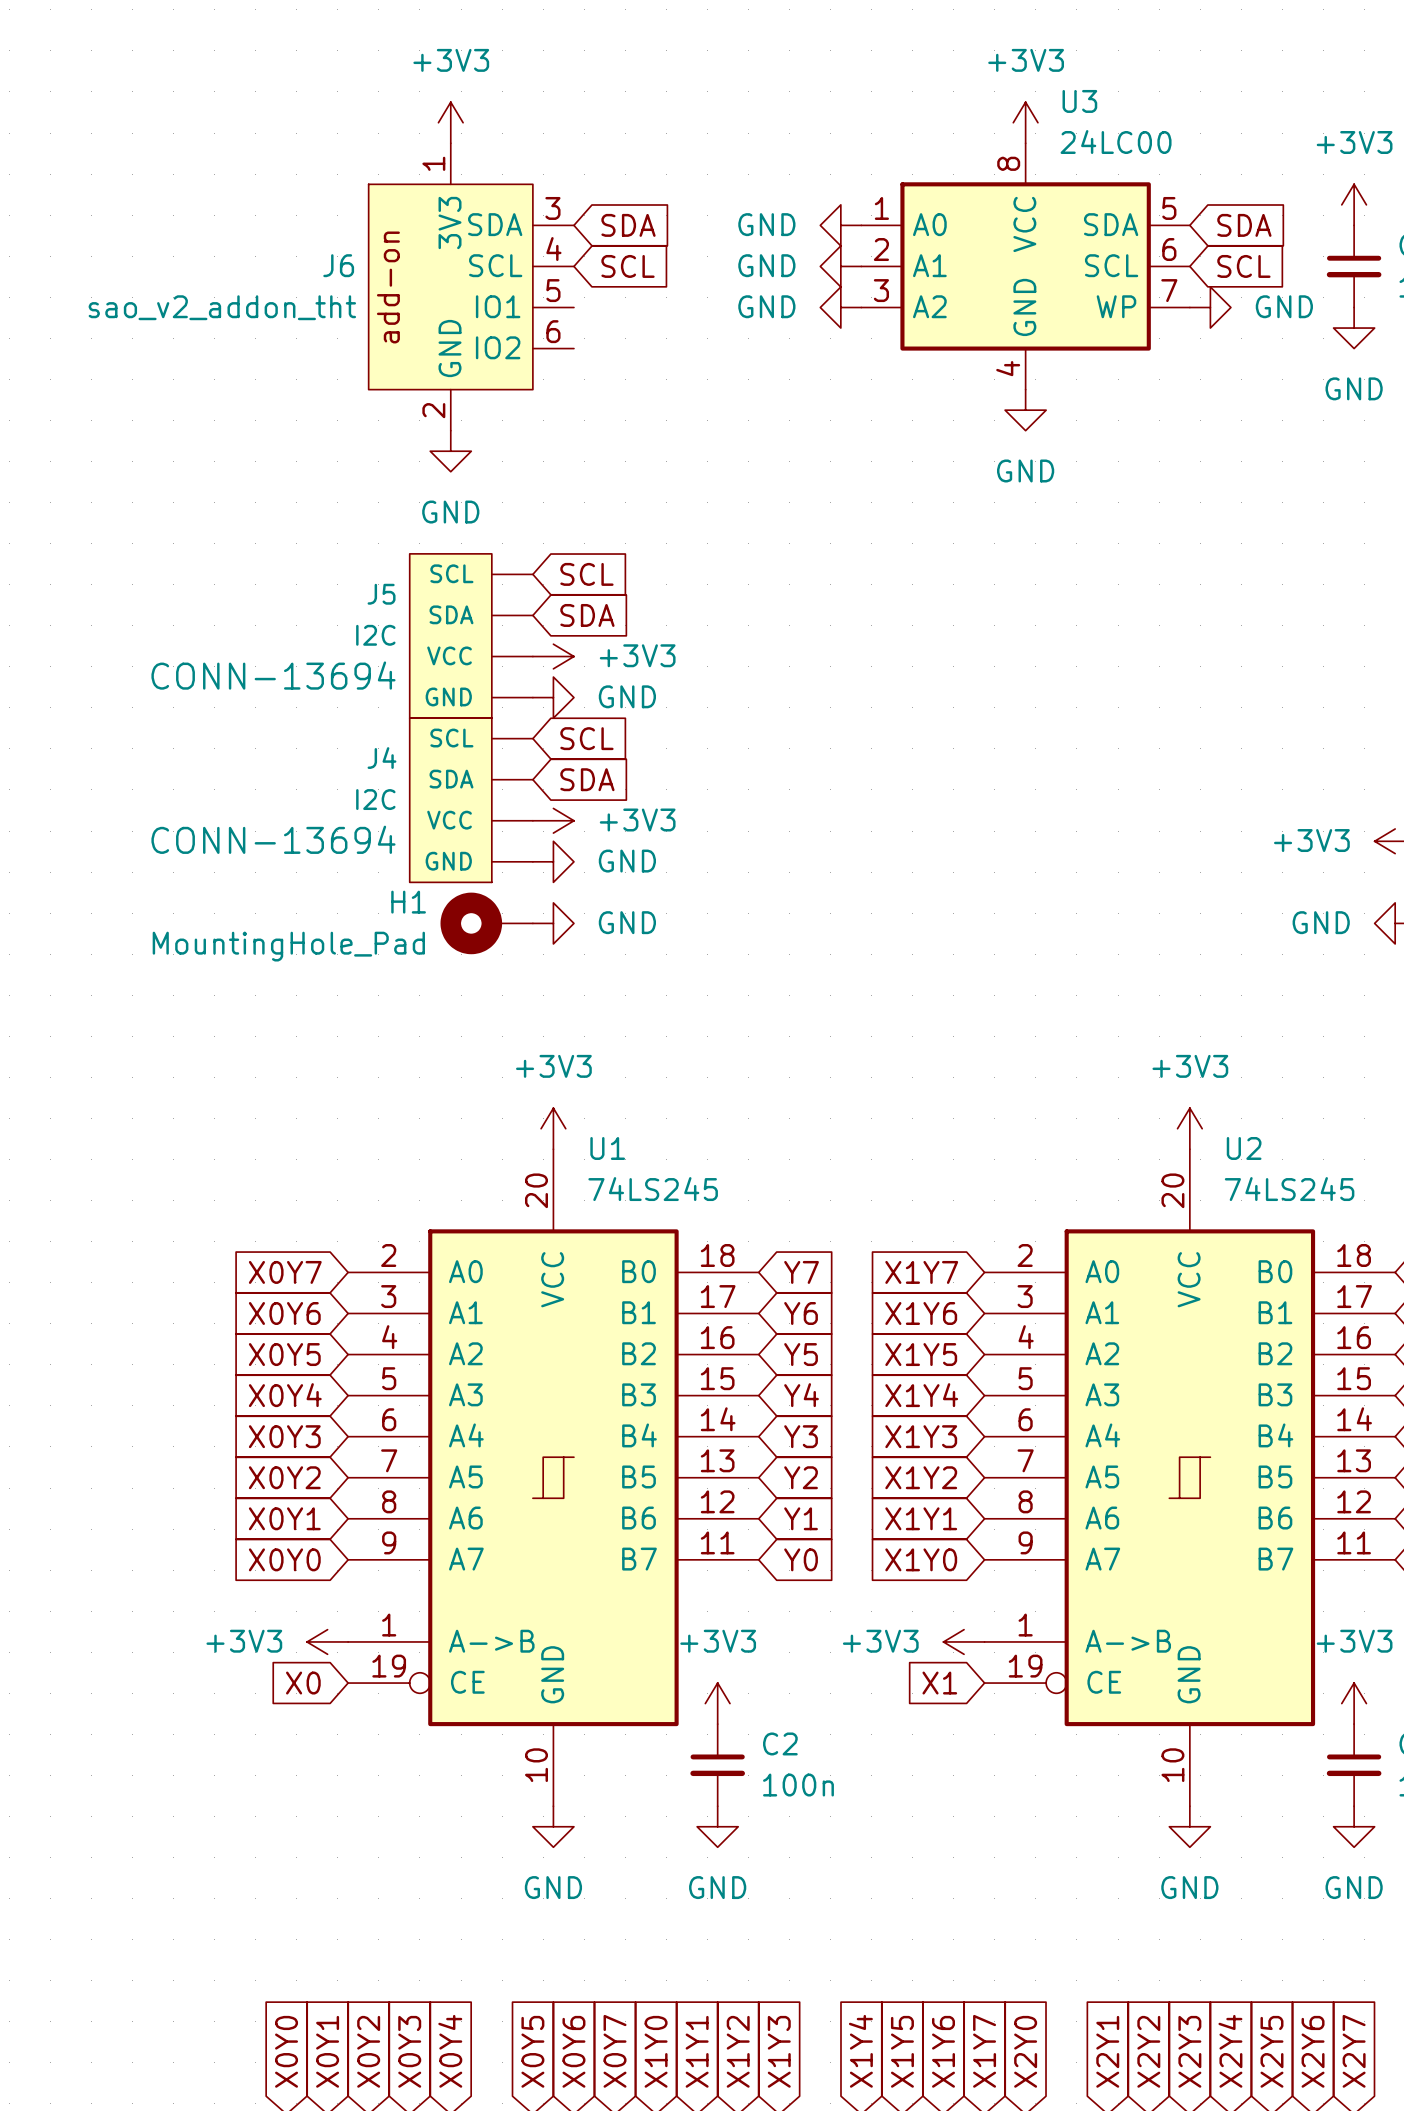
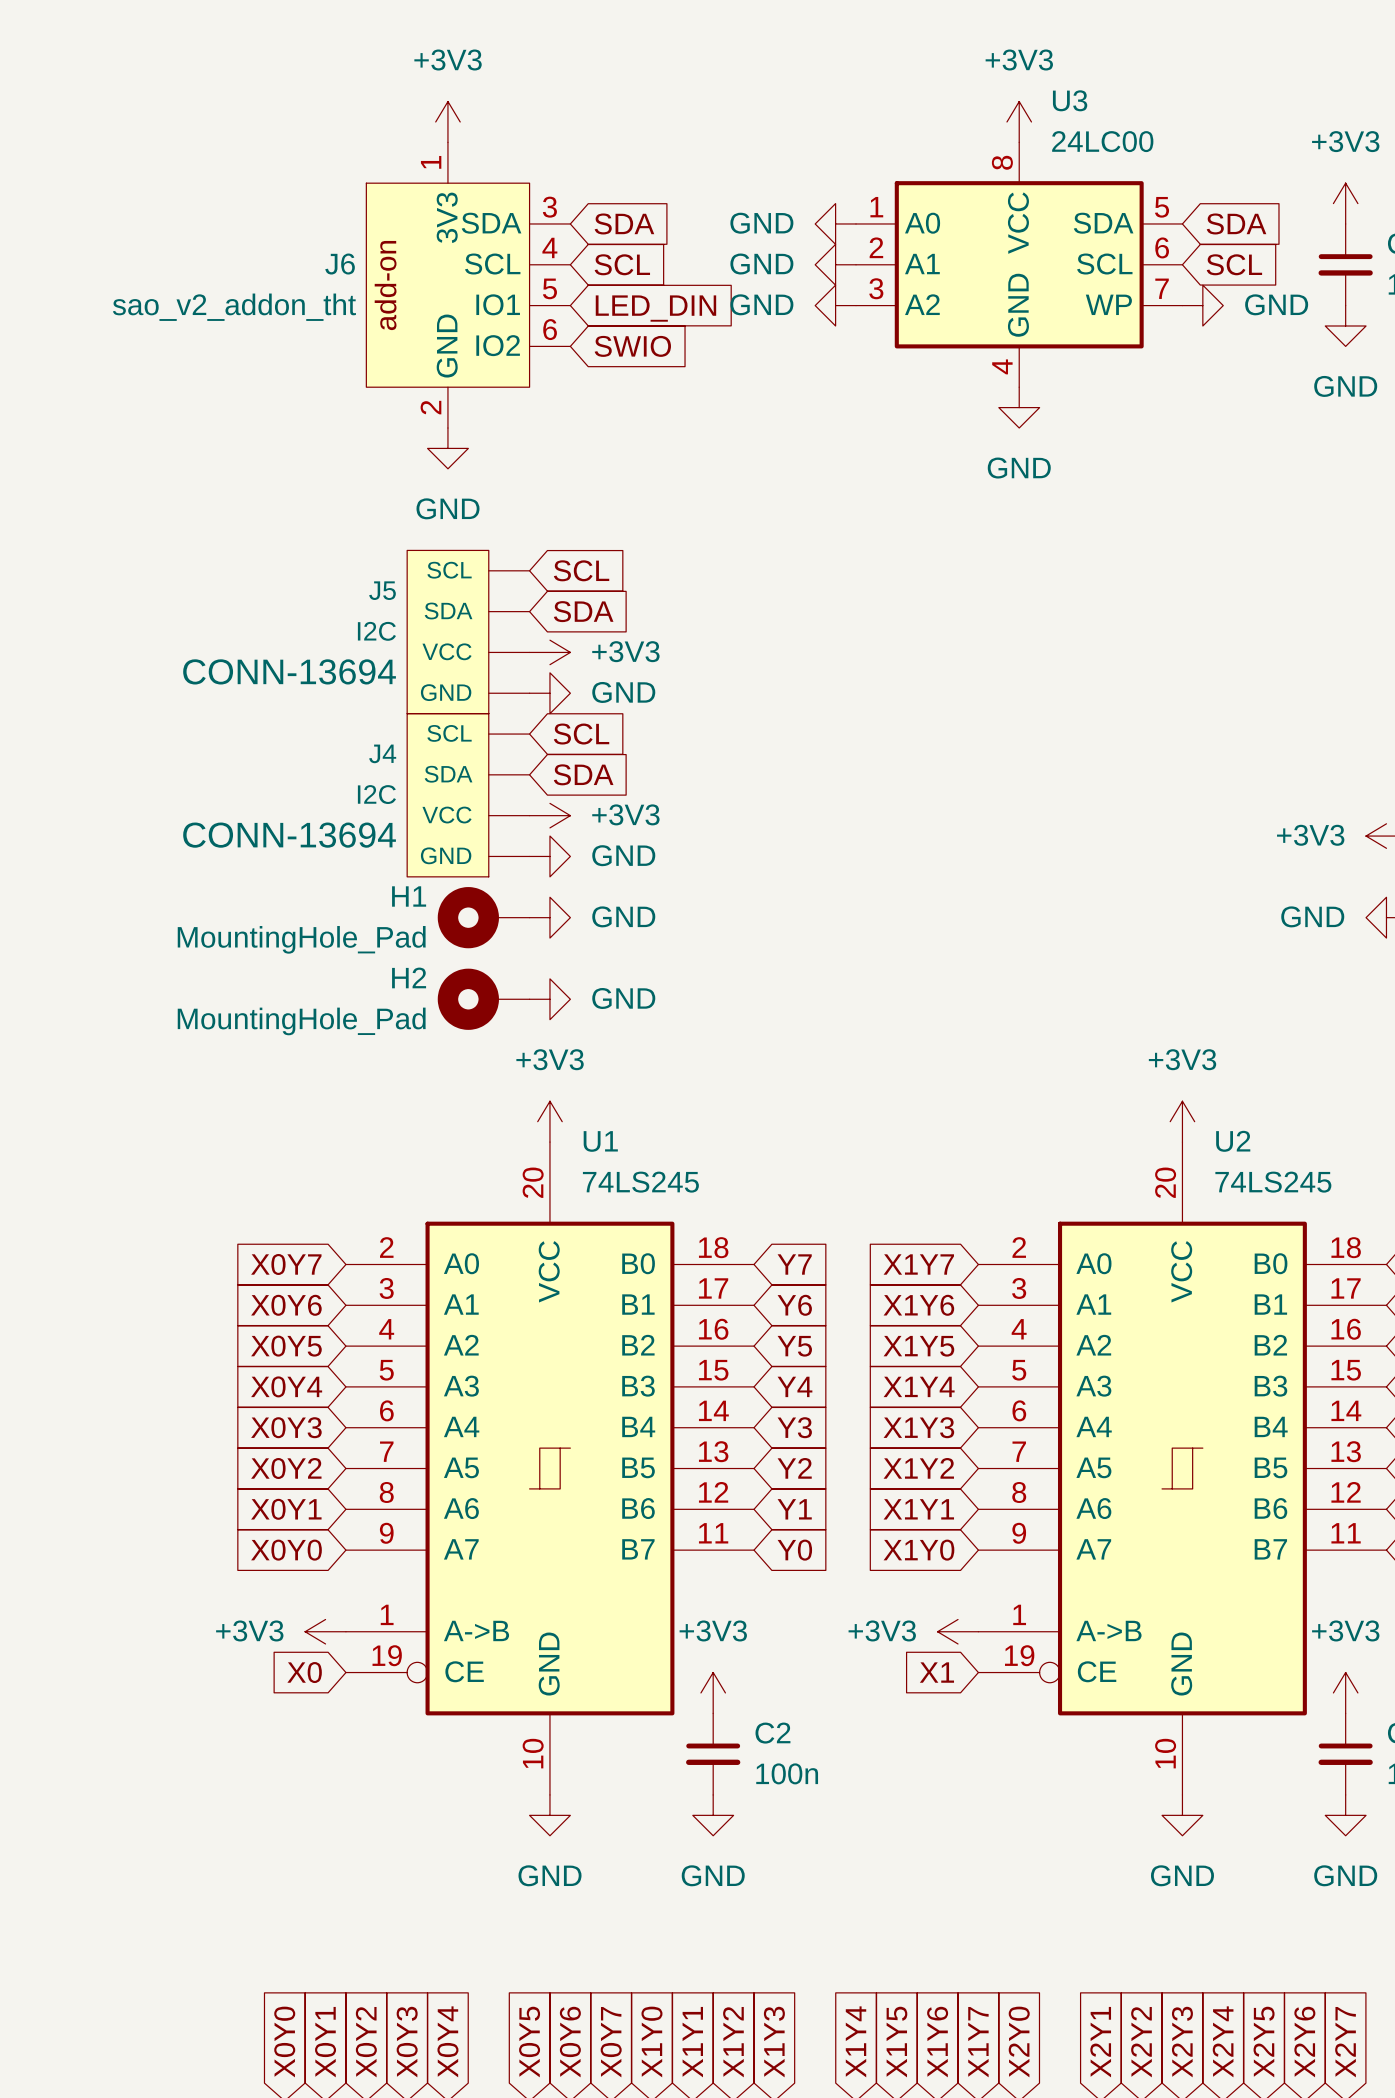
global label: none -> LED_DIN (655, 308)
global label: none -> SWIO (632, 346)
H2: none -> MountingHole_Pad (483, 999)
power symbol: none -> GND (549, 999)

